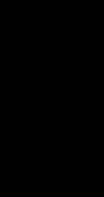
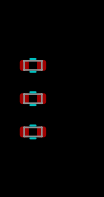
part: none -> (32, 65)
part: none -> (32, 98)
part: none -> (32, 131)

